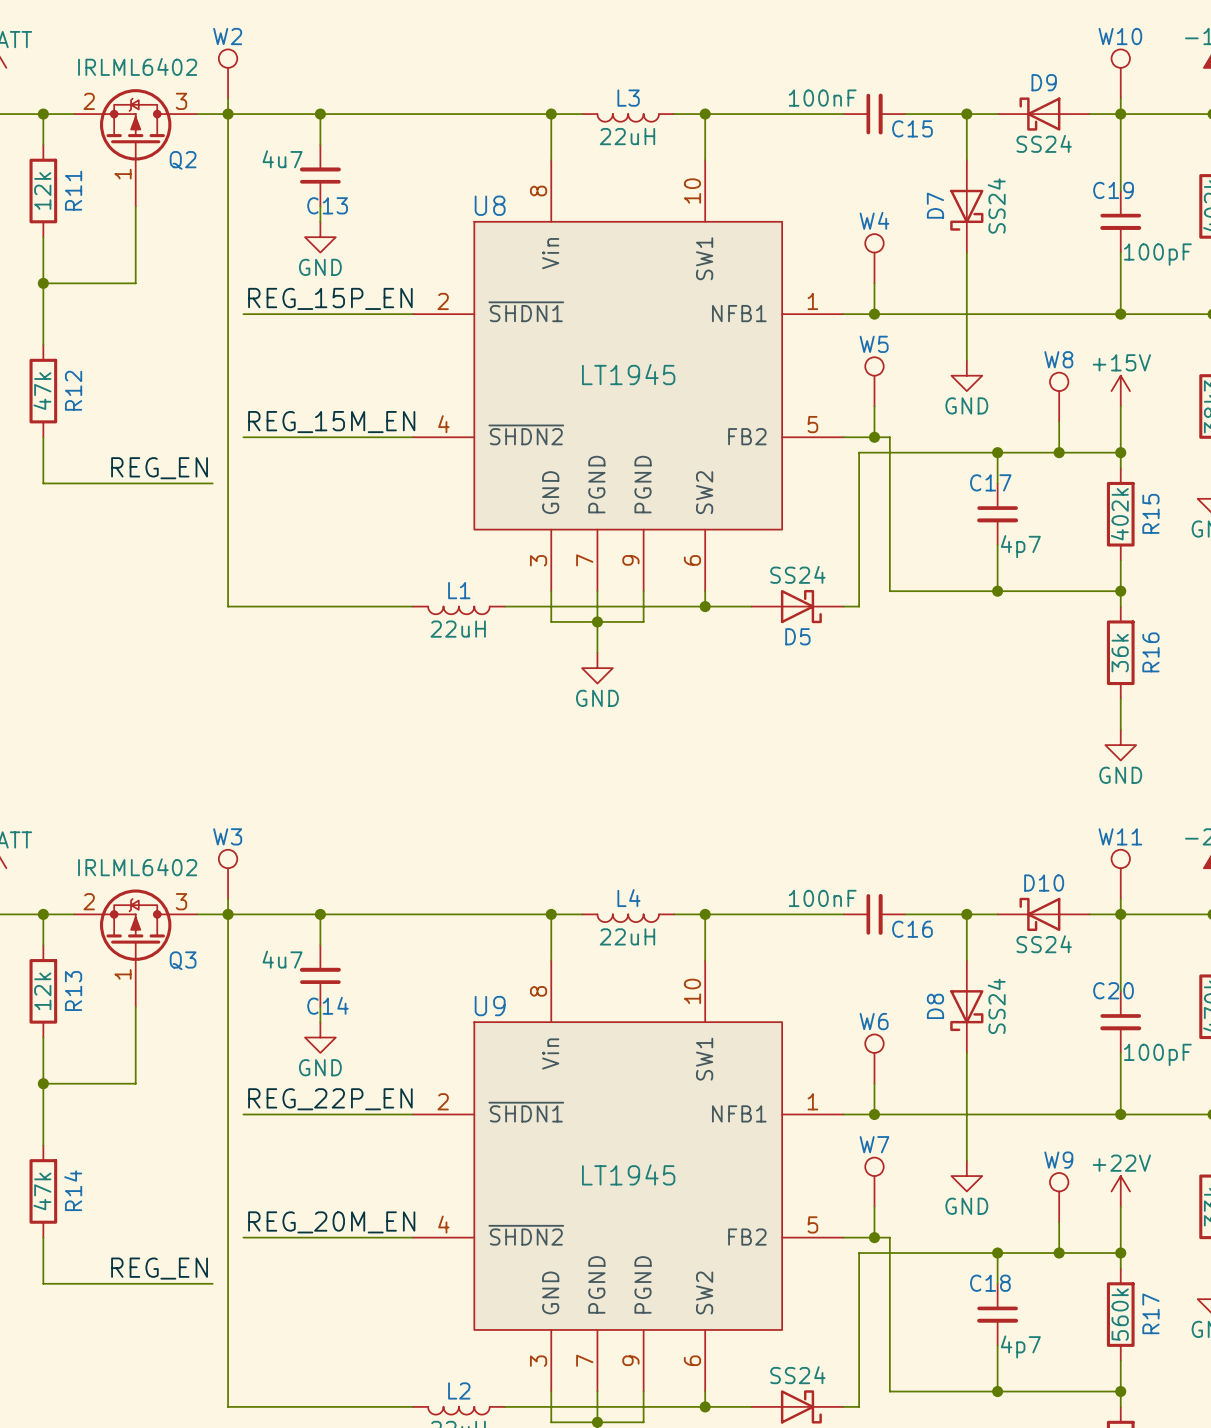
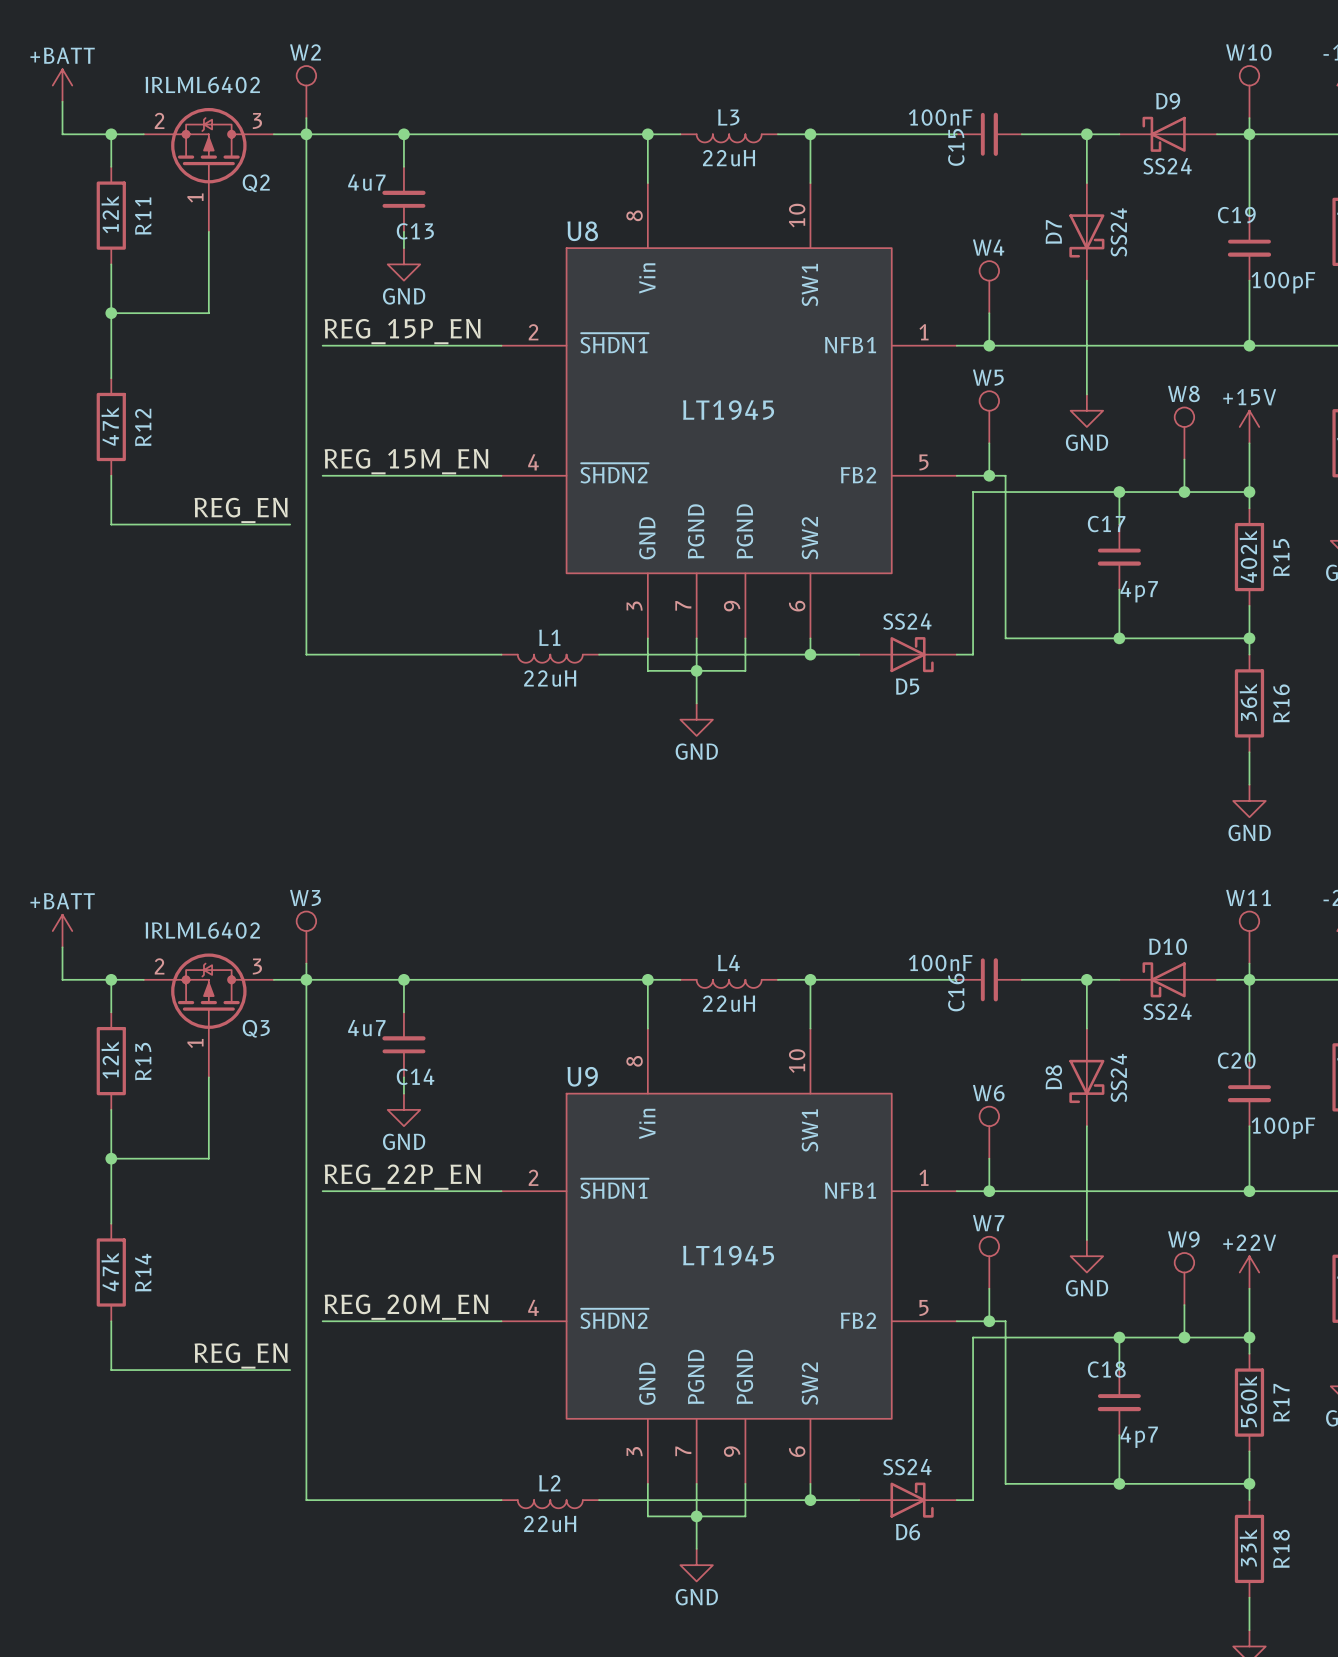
C15 name rotation: 0° (912, 128) -> 90° counterclockwise (956, 147)
C15 name position: C15 (912, 128) -> C15 (956, 147)
C16 name rotation: 0° (912, 929) -> 90° counterclockwise (956, 992)
C16 name position: C16 (912, 929) -> C16 (956, 992)

